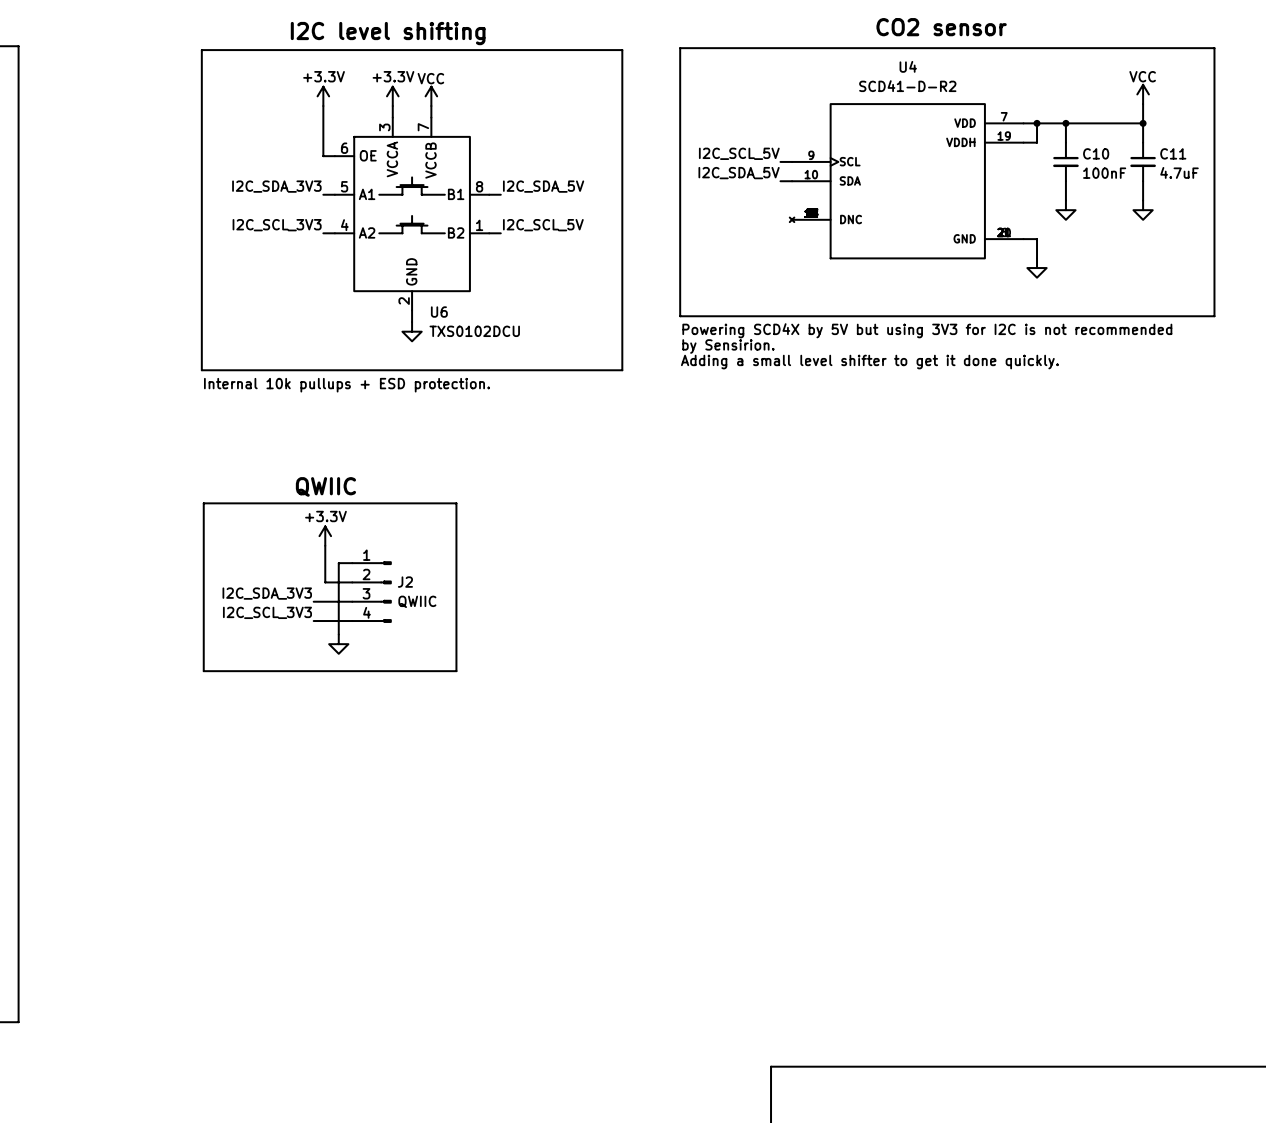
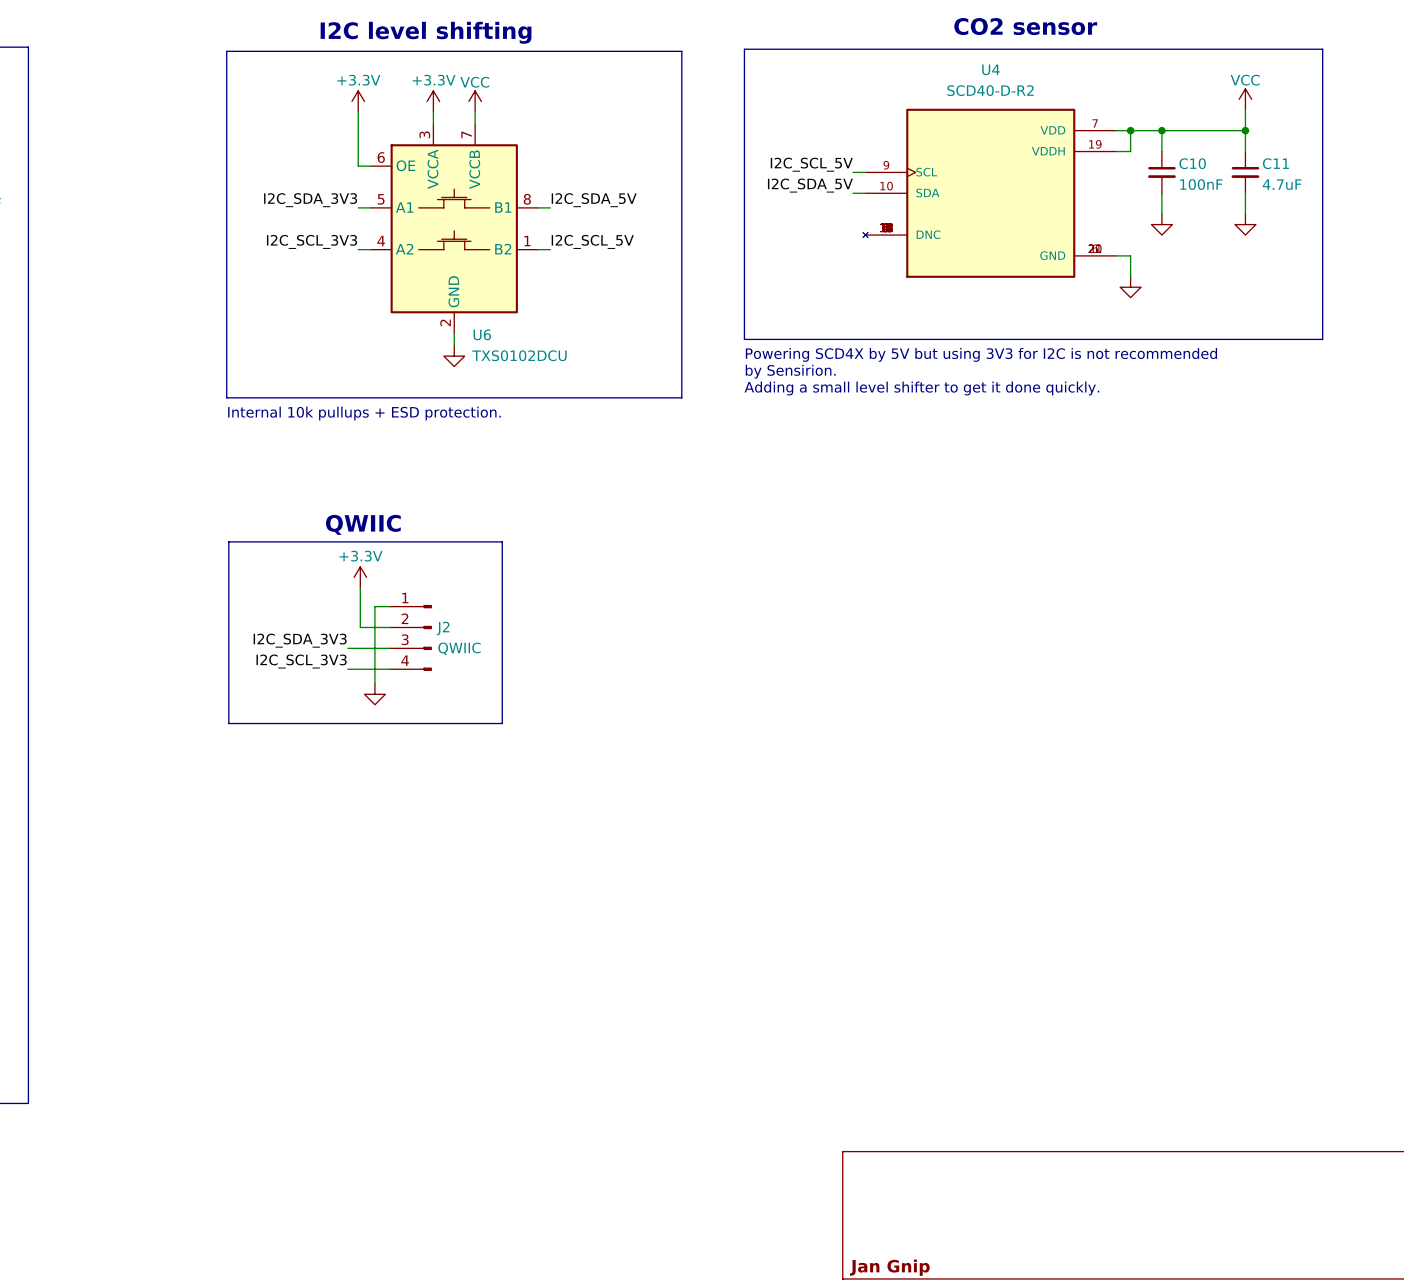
U4 value: SCD41-D-R2 (907, 86) -> SCD40-D-R2 (990, 90)

